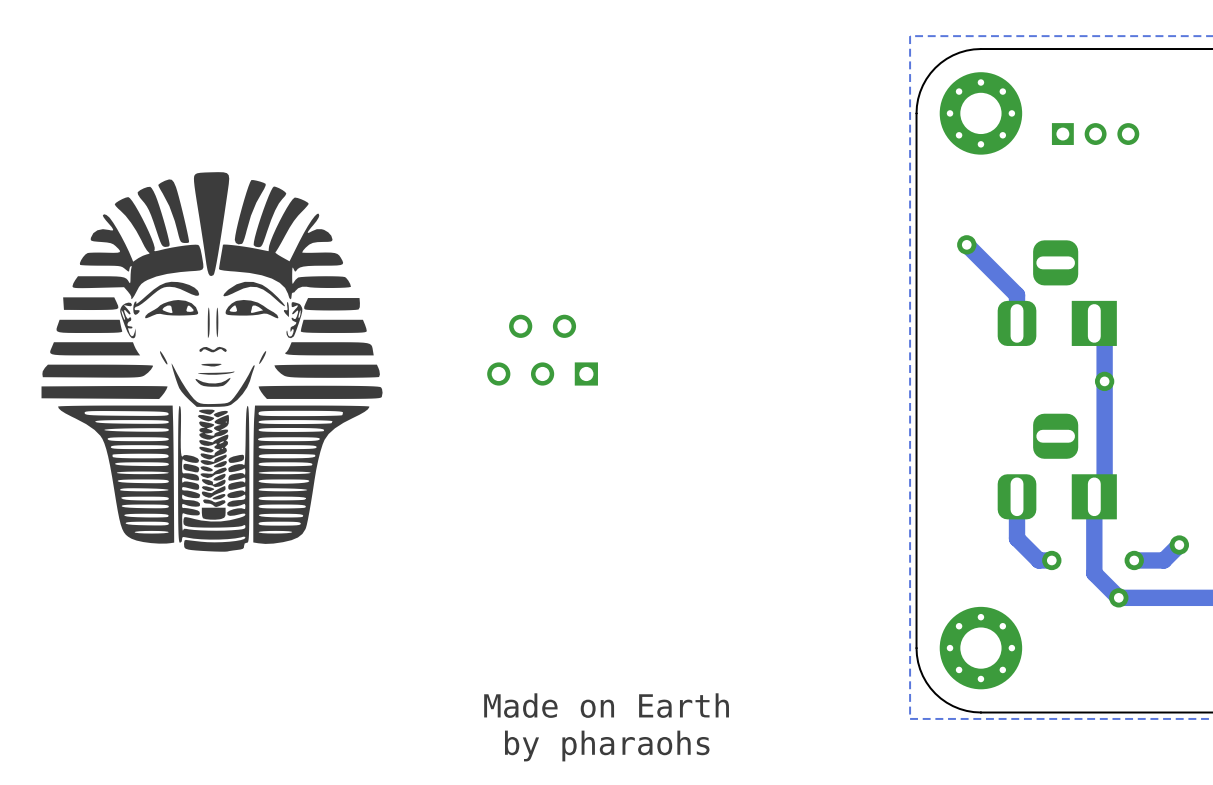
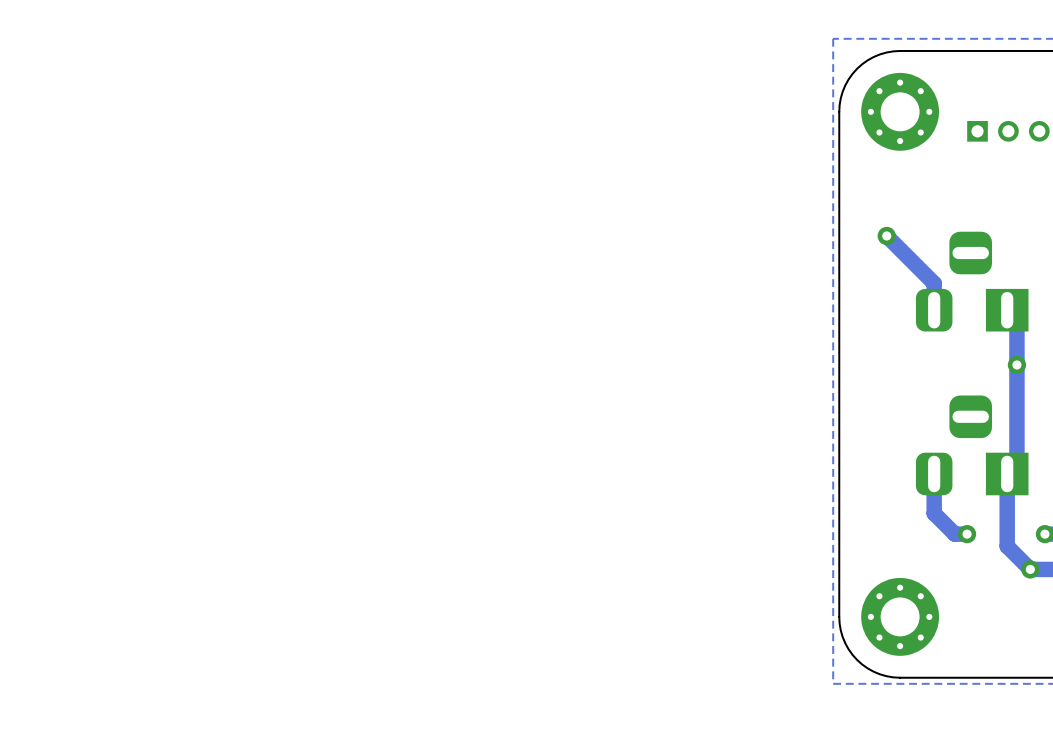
drawing: [41, 172, 383, 552] -> none
part: (542, 350) -> none
text: Made on Earth (606, 705) -> none
text: by pharaohs (607, 746) -> none

